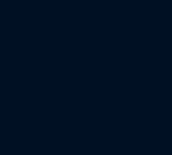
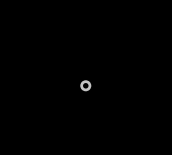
via: none -> (85, 85)

